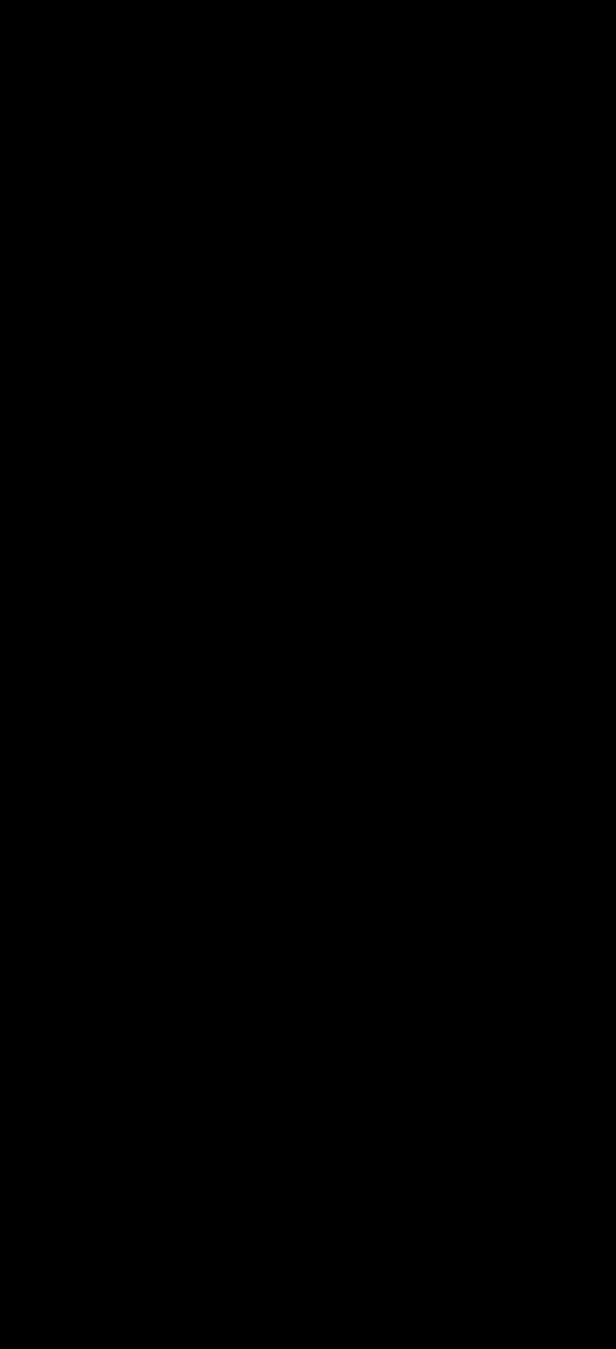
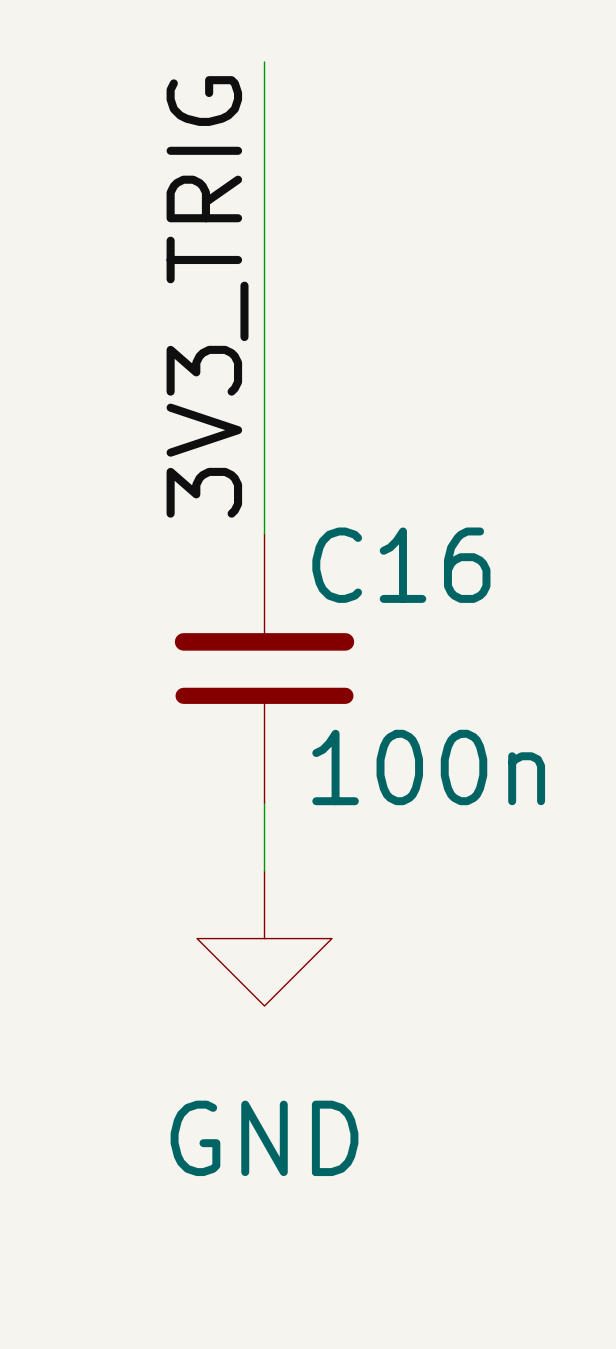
wire: none -> (264, 62) (264, 534)
label: none -> 3V3_TRIG (207, 296)
C16: none -> (264, 668)
wire: none -> (264, 803) (264, 871)
power symbol: none -> GND (264, 938)

